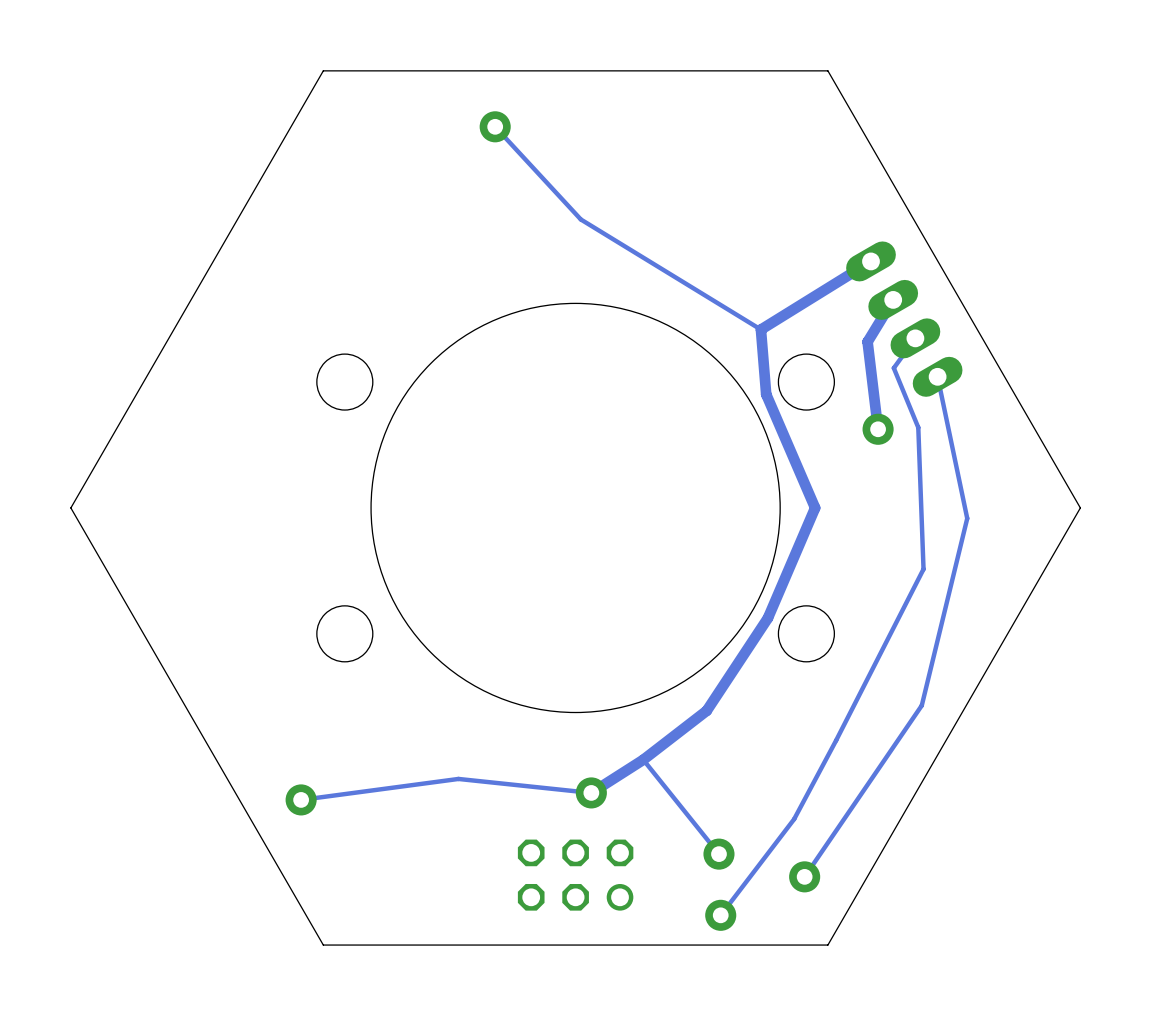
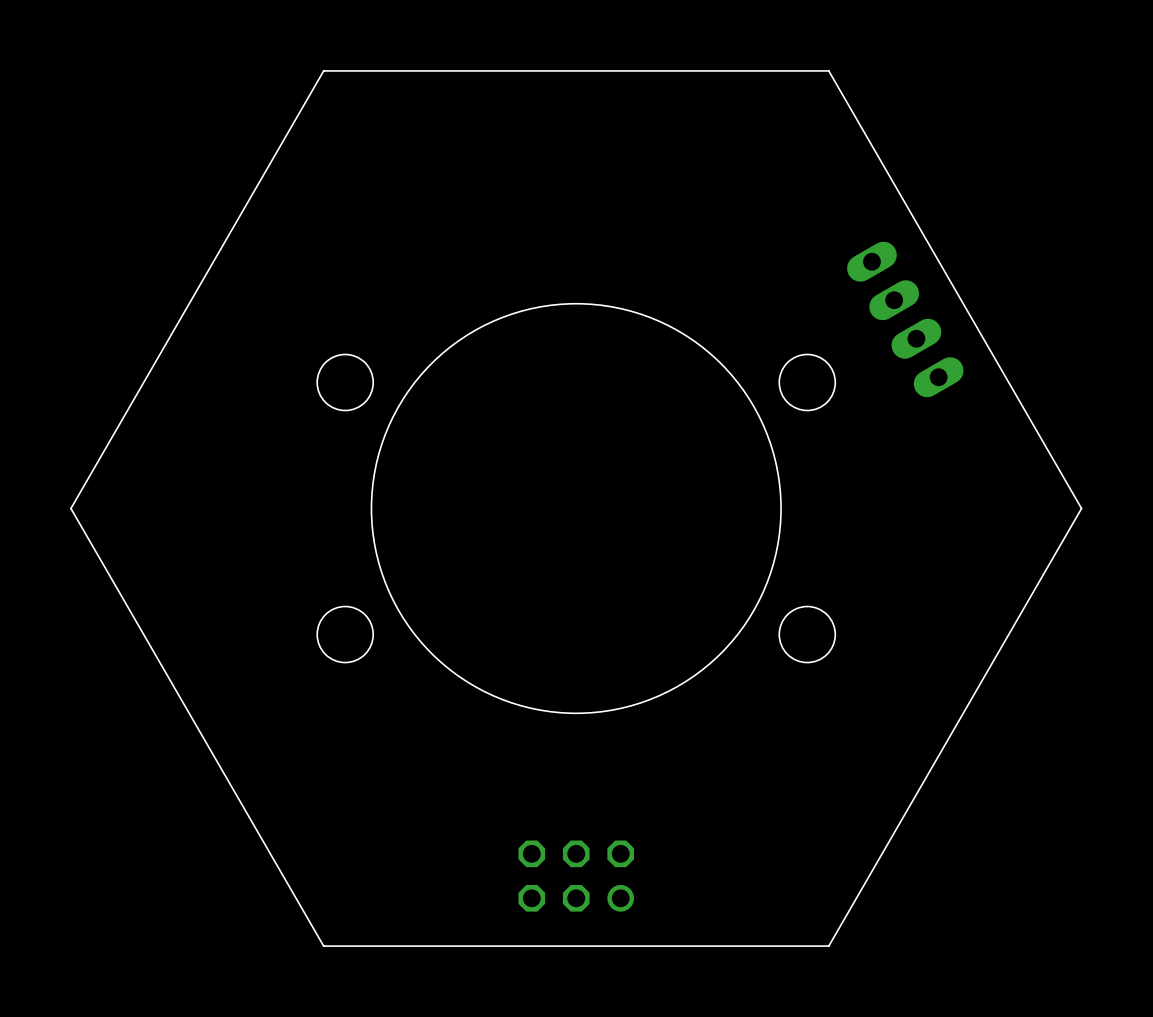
track: (495, 126) (580, 219) (760, 329) -> none
via: (495, 126) -> none
track: (871, 261) (760, 329) -> none
track: (893, 299) (867, 341) (878, 429) -> none
track: (760, 329) (766, 394) (815, 507) (767, 618) (706, 710) (643, 759) -> none
track: (915, 338) (893, 368) (918, 427) (923, 569) (794, 819) (720, 915) -> none
track: (937, 376) (967, 518) (921, 705) (804, 876) -> none
via: (878, 429) -> none
track: (643, 759) (718, 854) -> none
track: (643, 759) (591, 792) (458, 778) (301, 799) -> none
via: (591, 792) -> none
via: (301, 799) -> none
via: (718, 854) -> none
via: (804, 876) -> none
via: (720, 915) -> none

